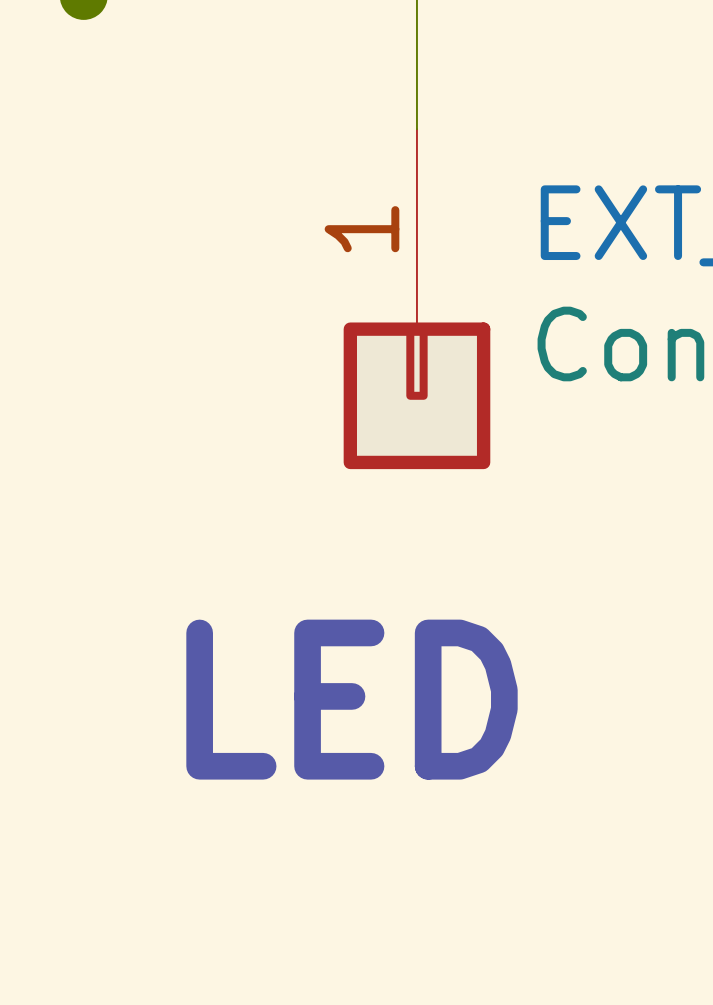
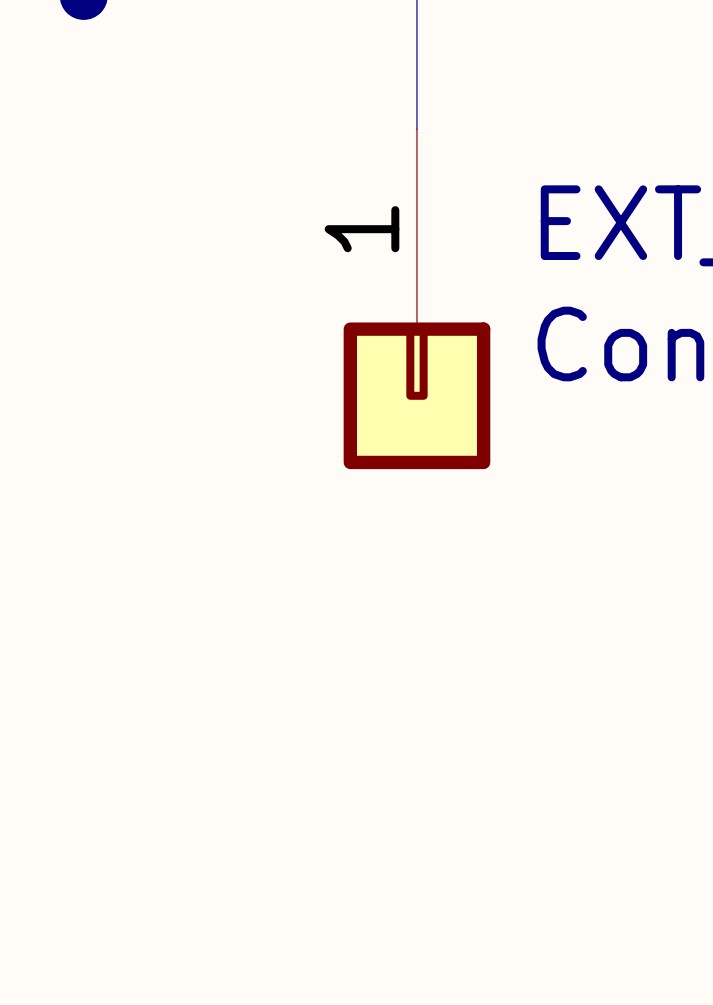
text: LED (352, 699) -> none

